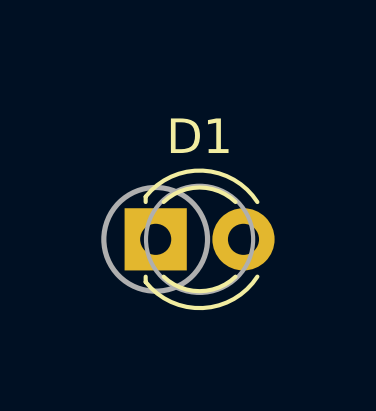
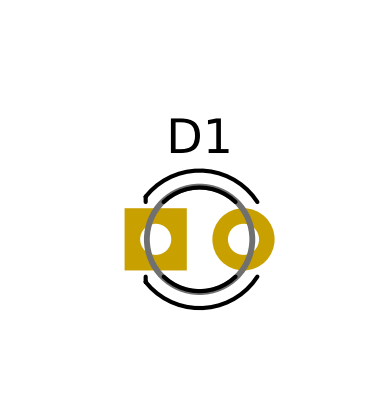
D1 footprint: [101, 168, 275, 311] -> [124, 168, 275, 311]

